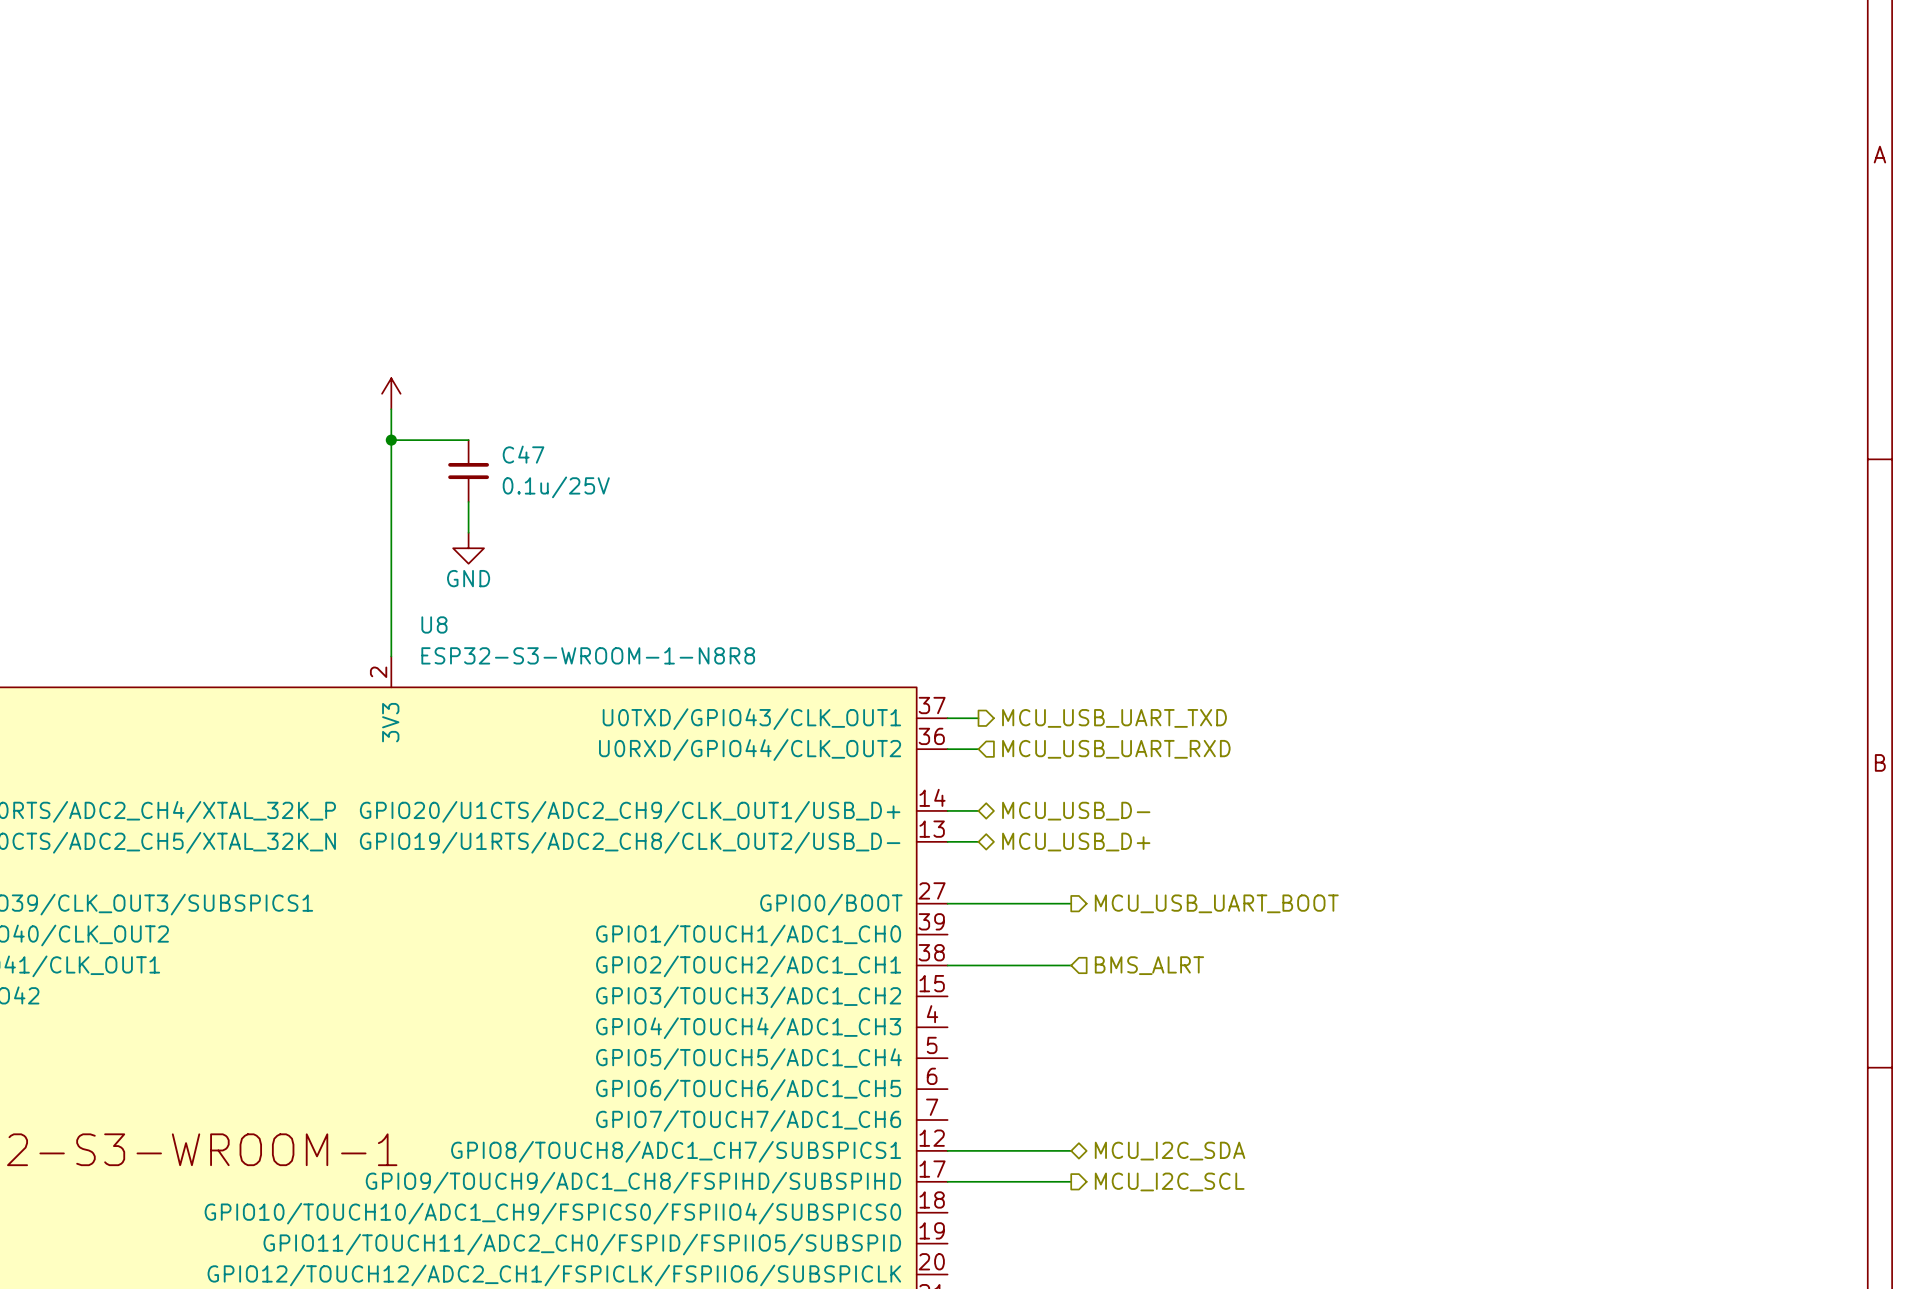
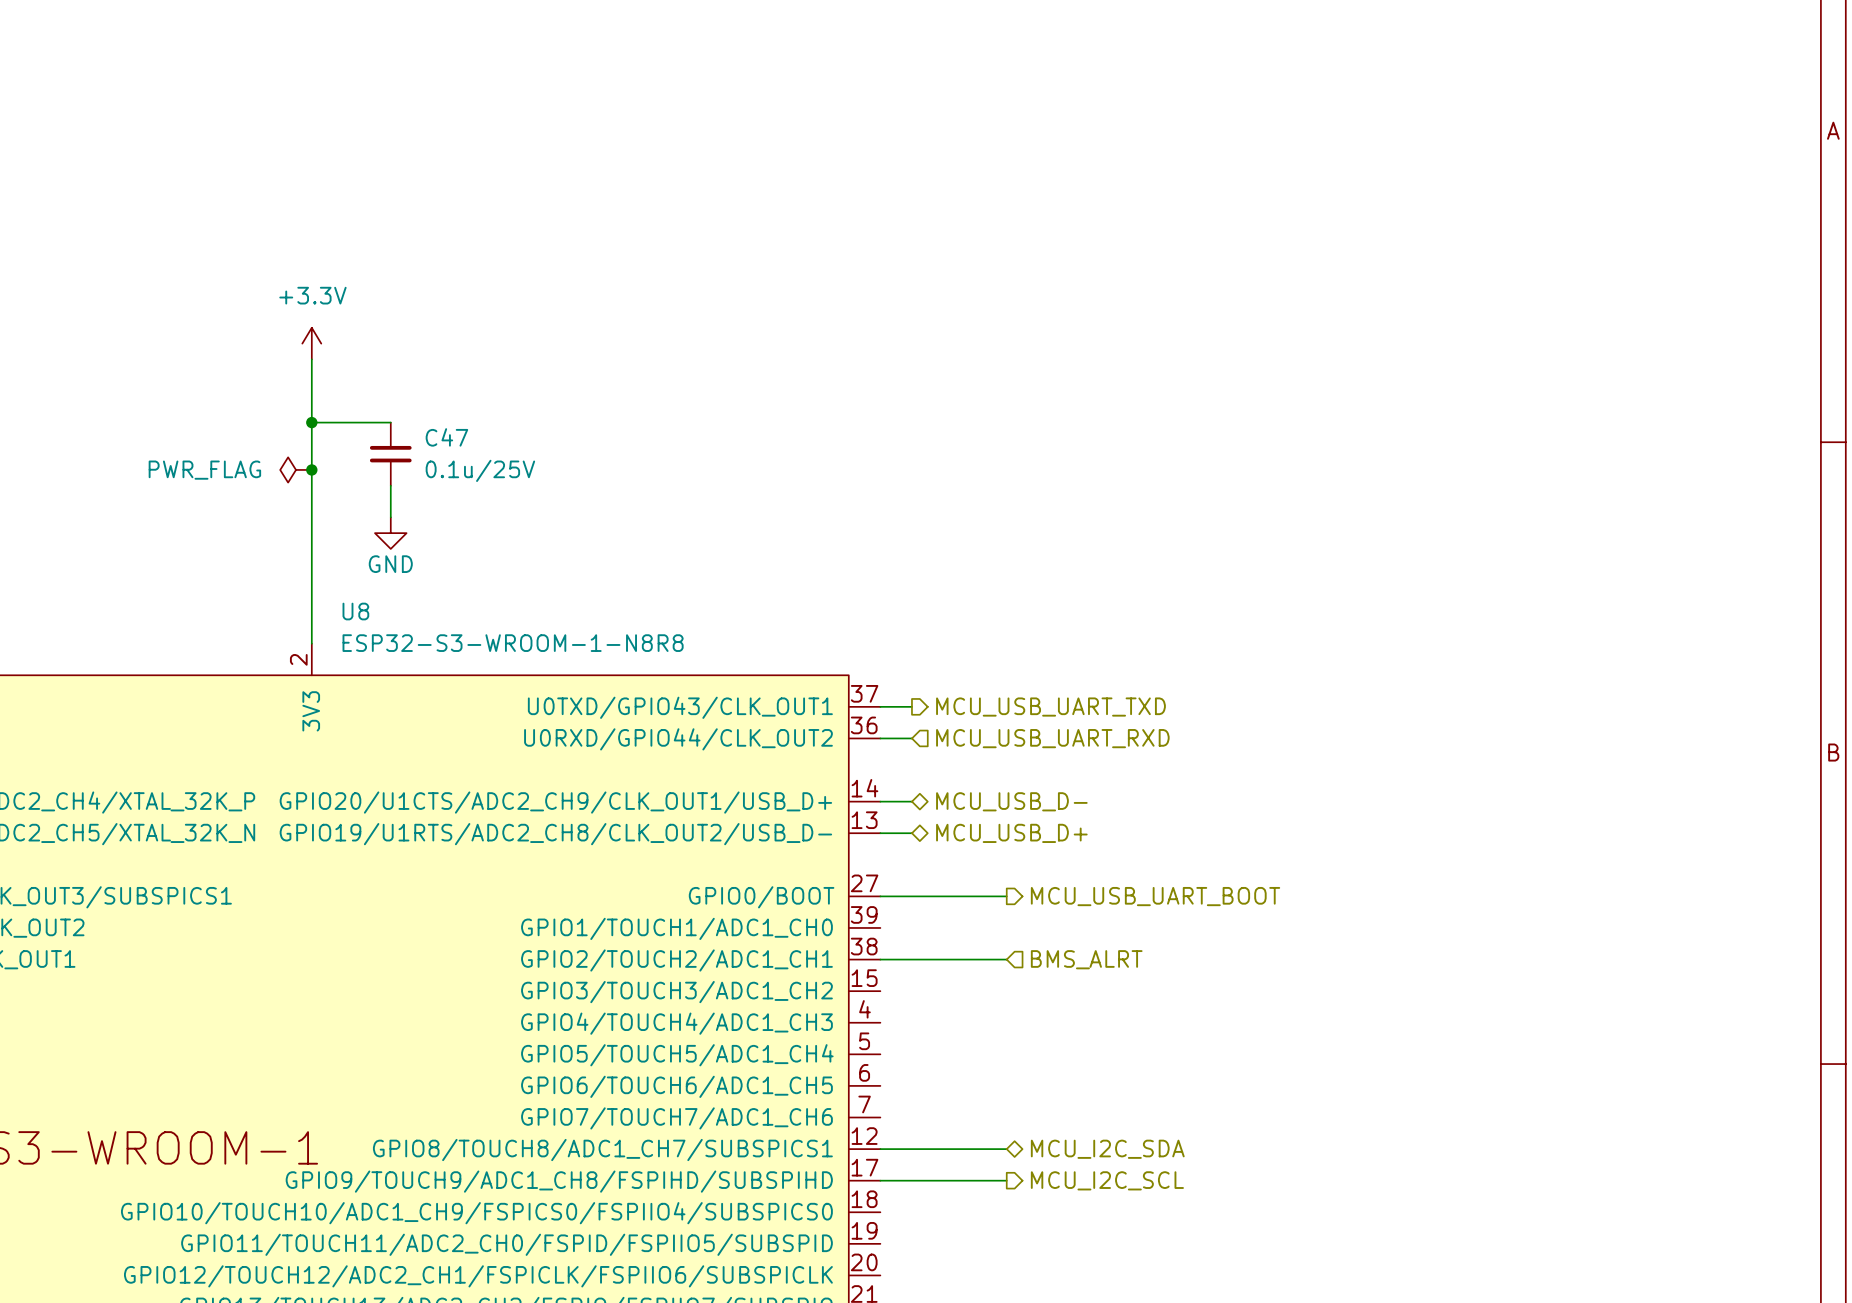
power symbol: none -> +3.3V (311, 343)
power symbol: (391, 393) -> none
power symbol: none -> PWR_FLAG (296, 469)
junction: none -> (311, 469)

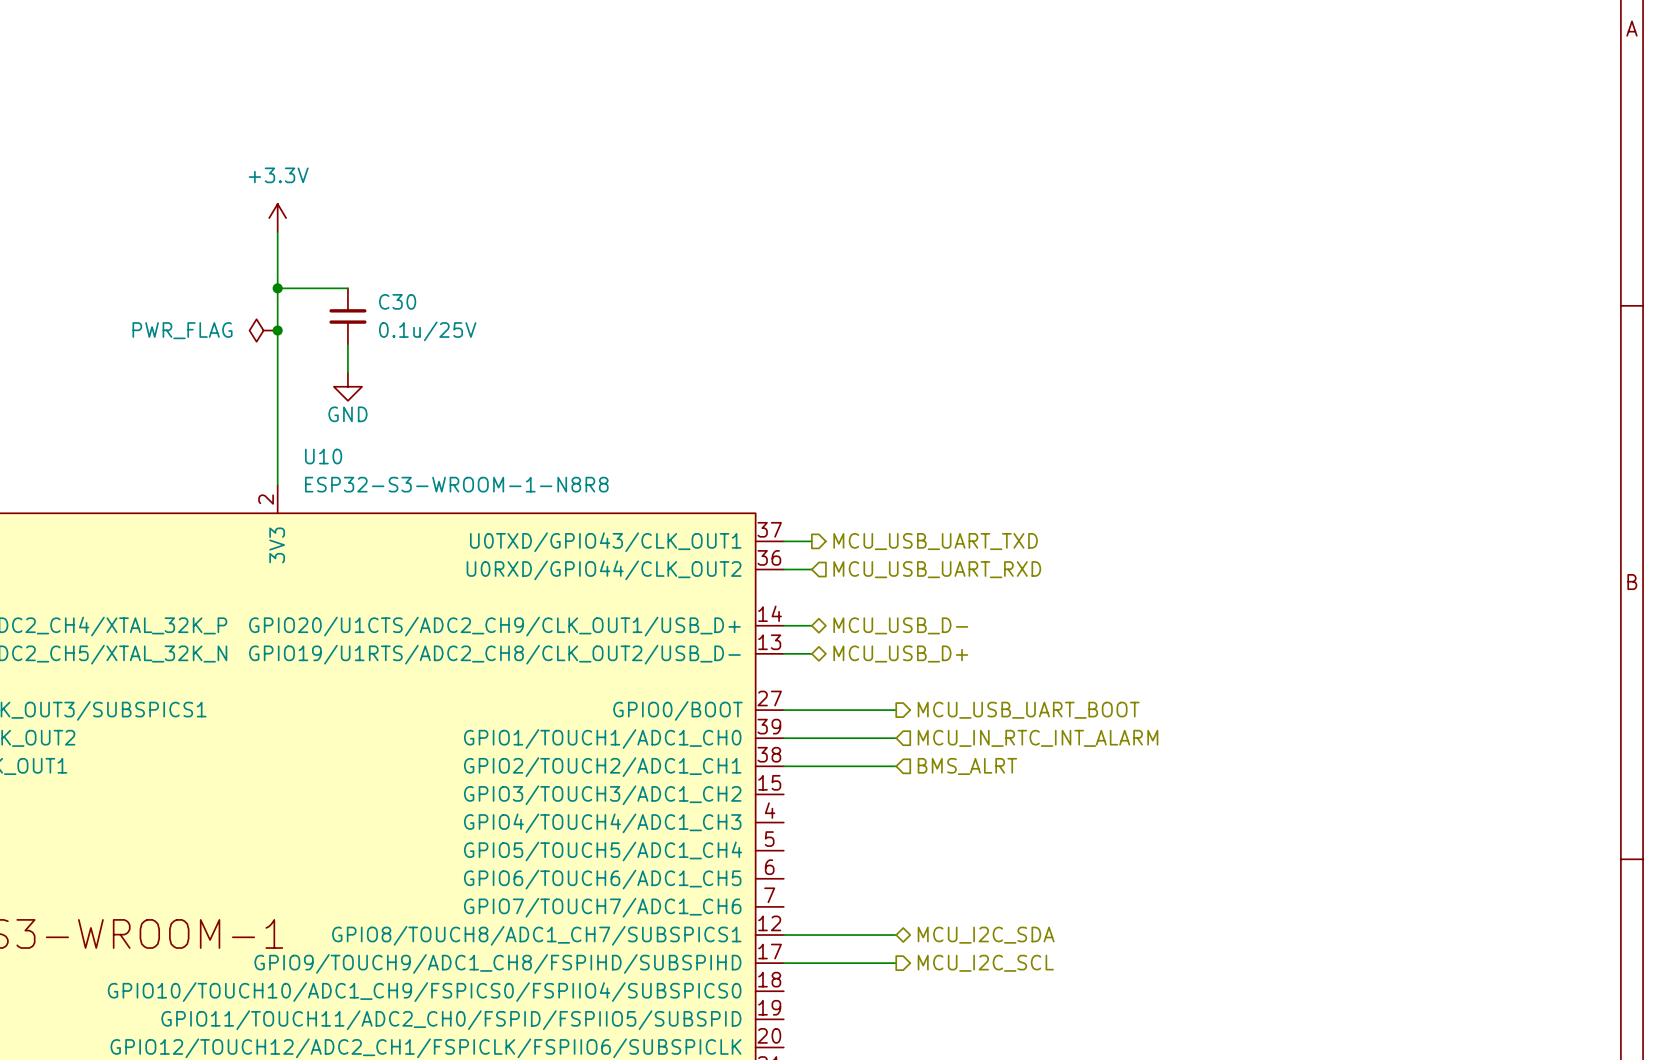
C47 name: C47 (446, 437) -> C30 (397, 301)
U8 name: U8 (355, 611) -> U10 (323, 456)
wire: none -> (783, 738) (896, 738)
hierarchical label: none -> MCU_IN_RTC_INT_ALARM (1038, 738)

